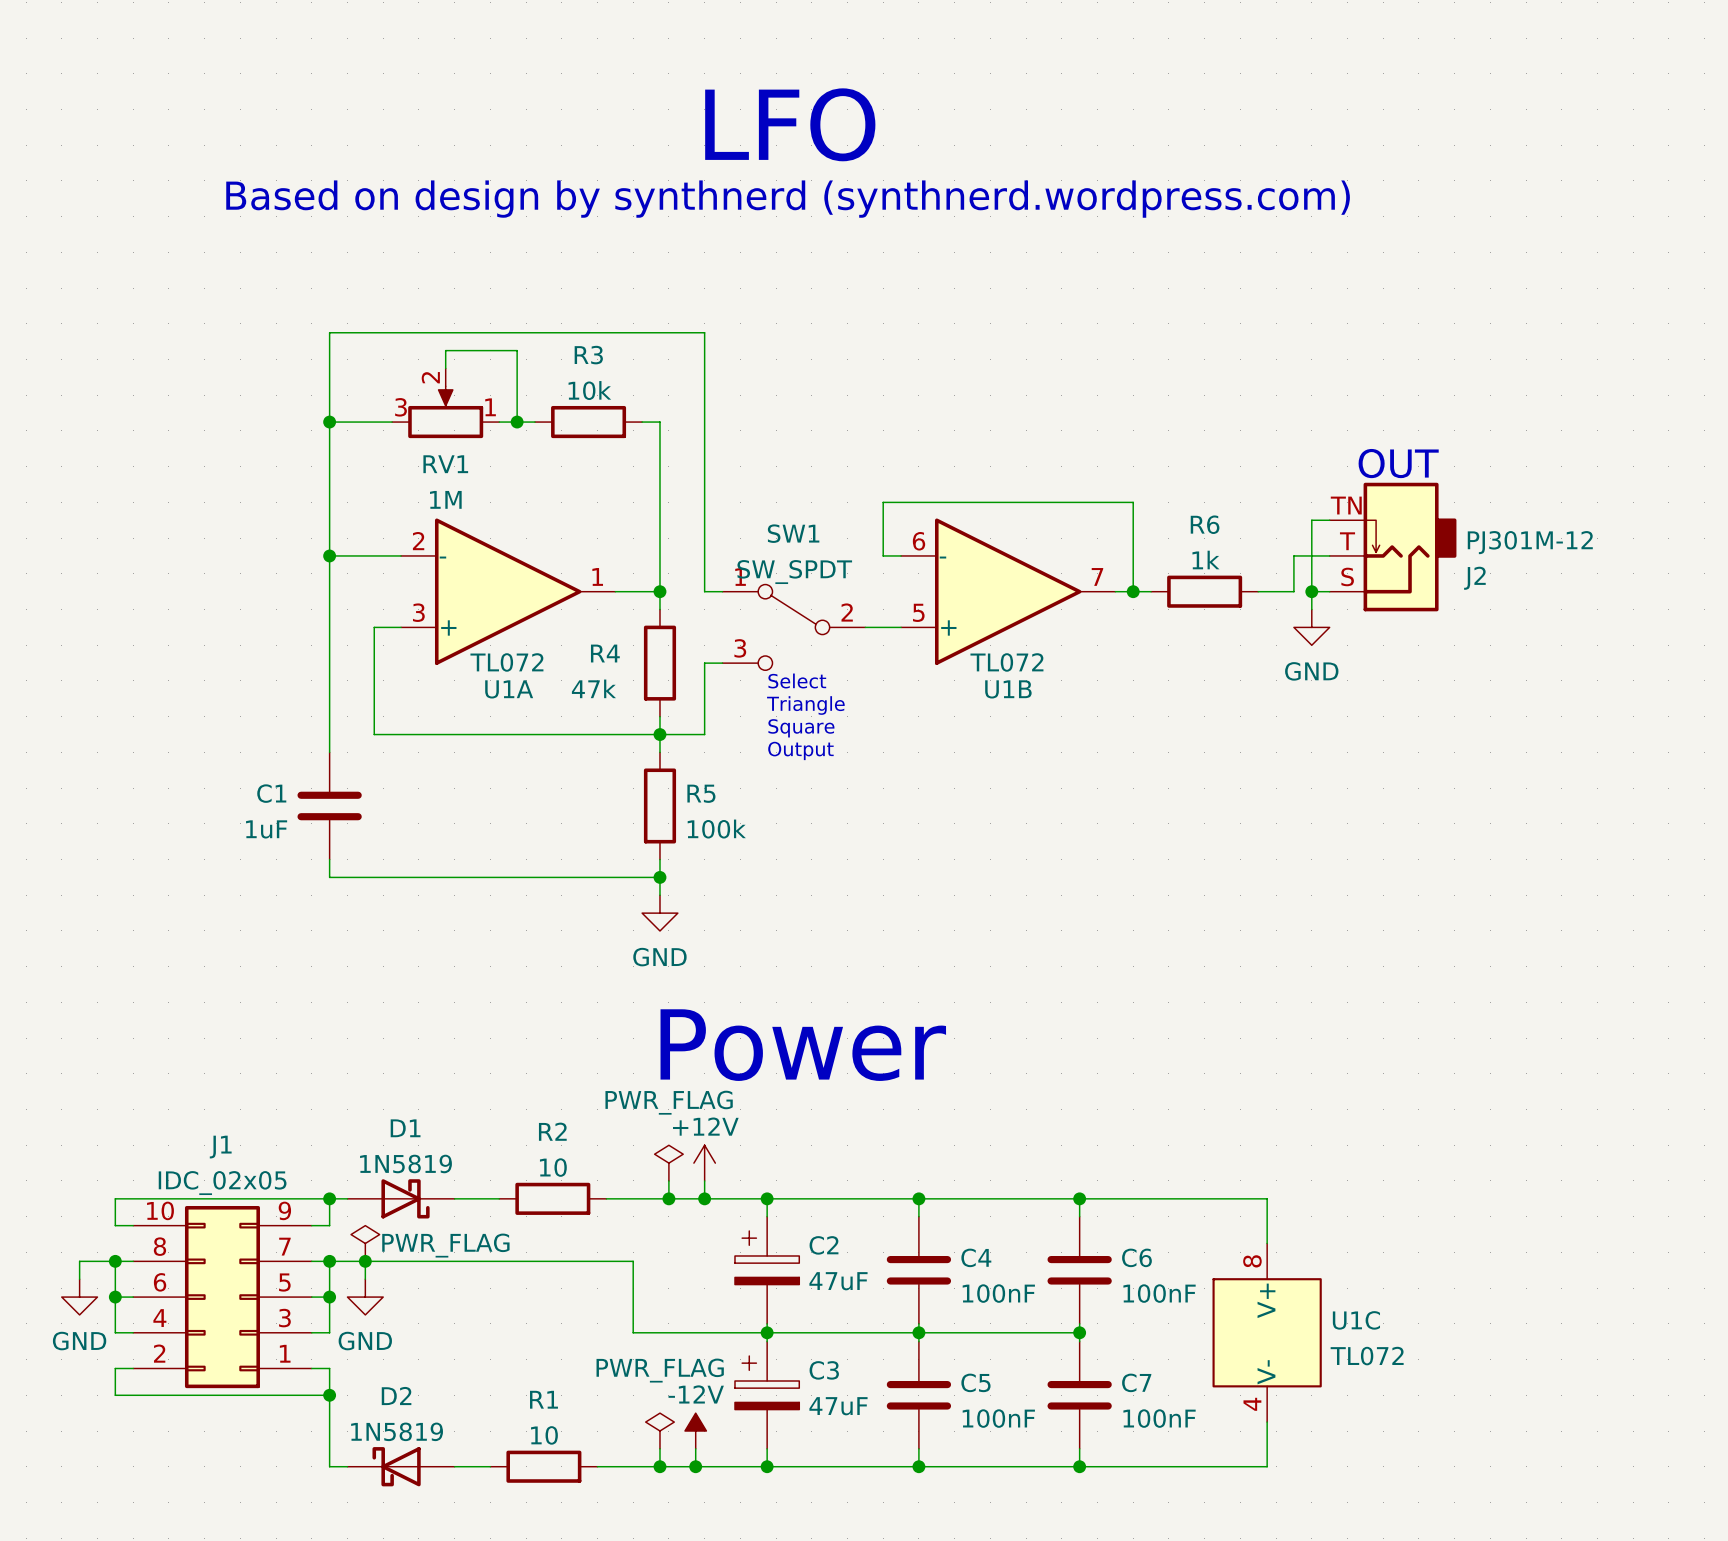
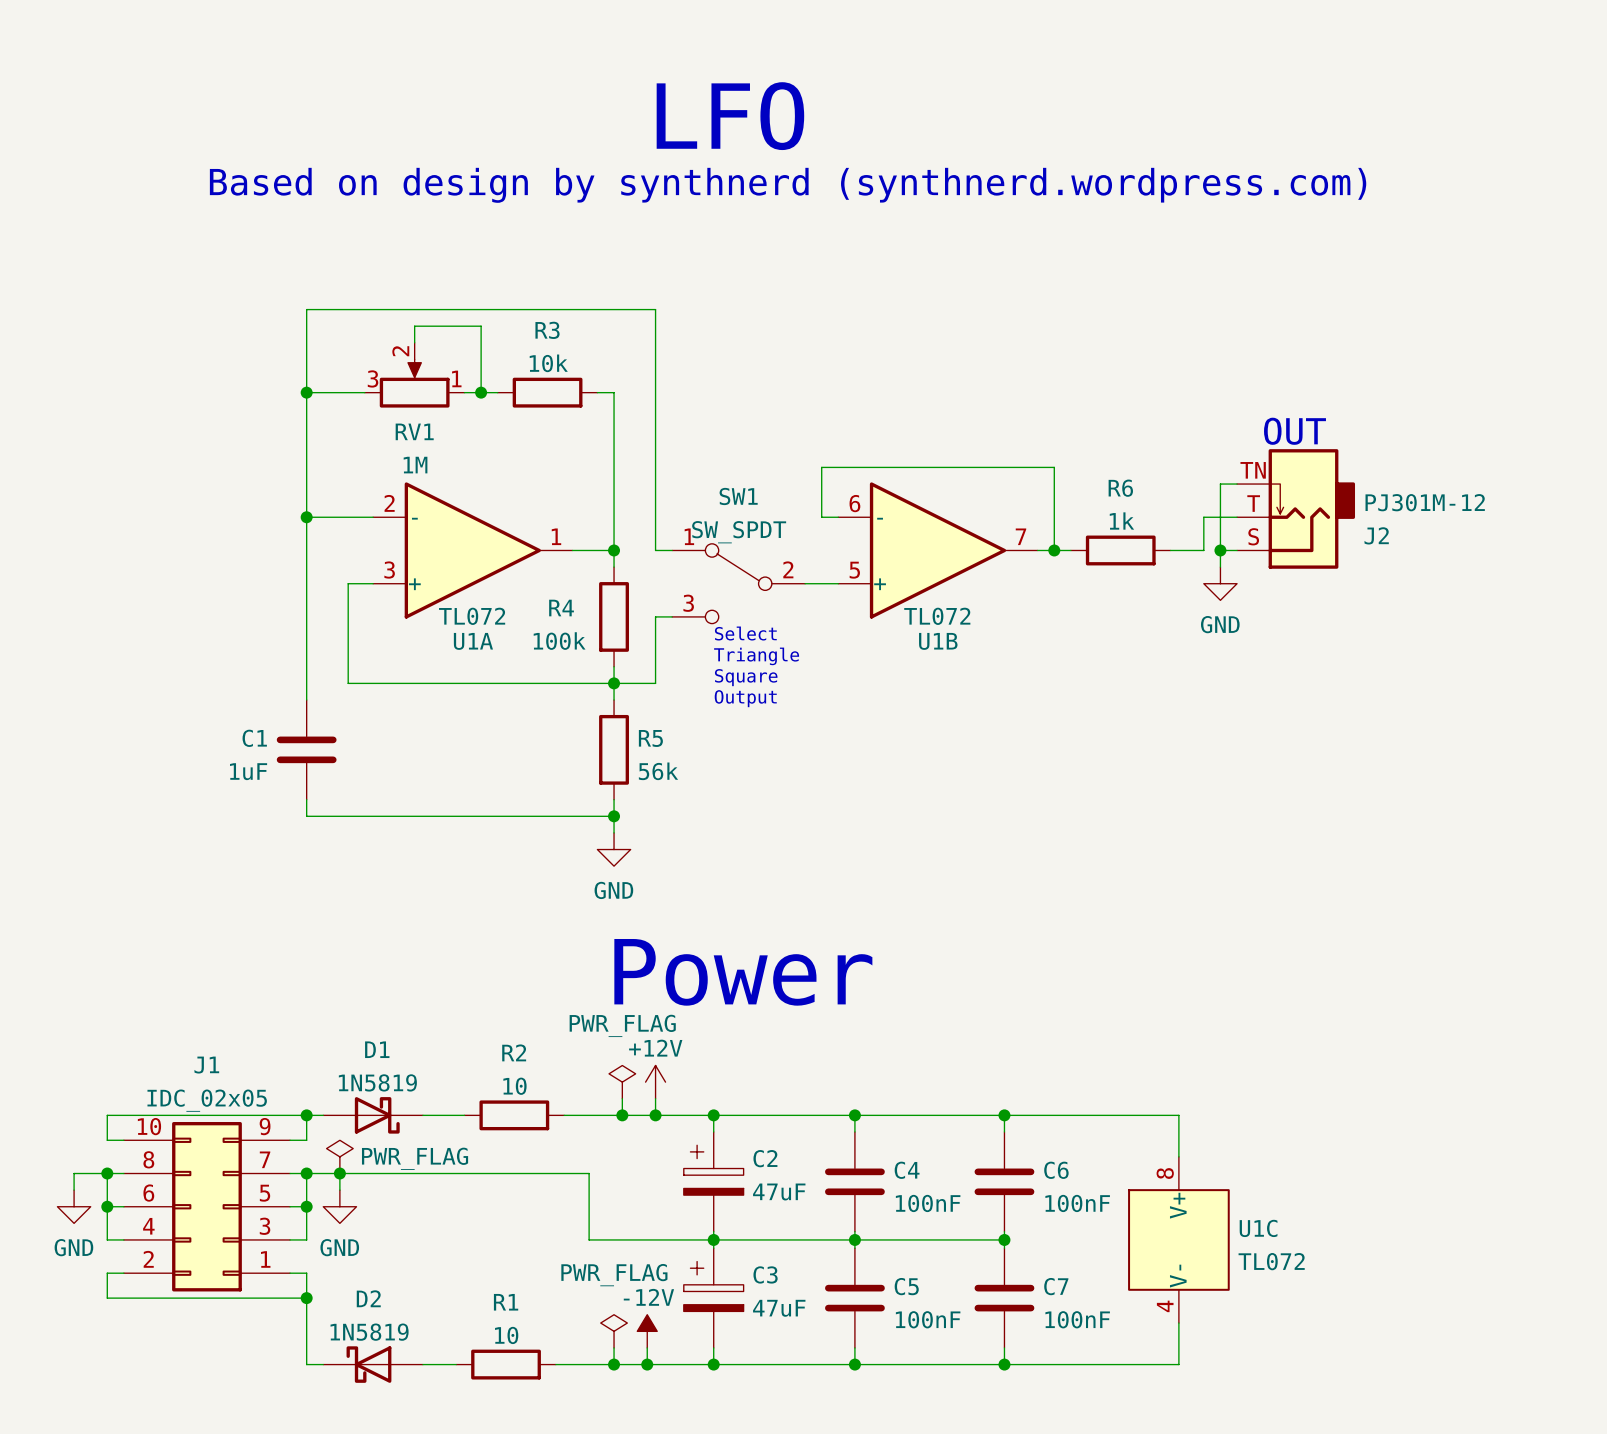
R4 value: 47k (593, 688) -> 100k (559, 641)
R5 value: 100k (716, 829) -> 56k (658, 771)

